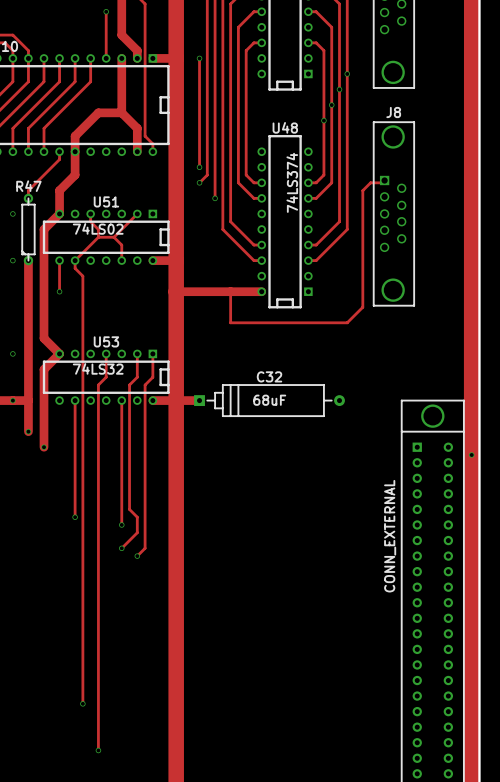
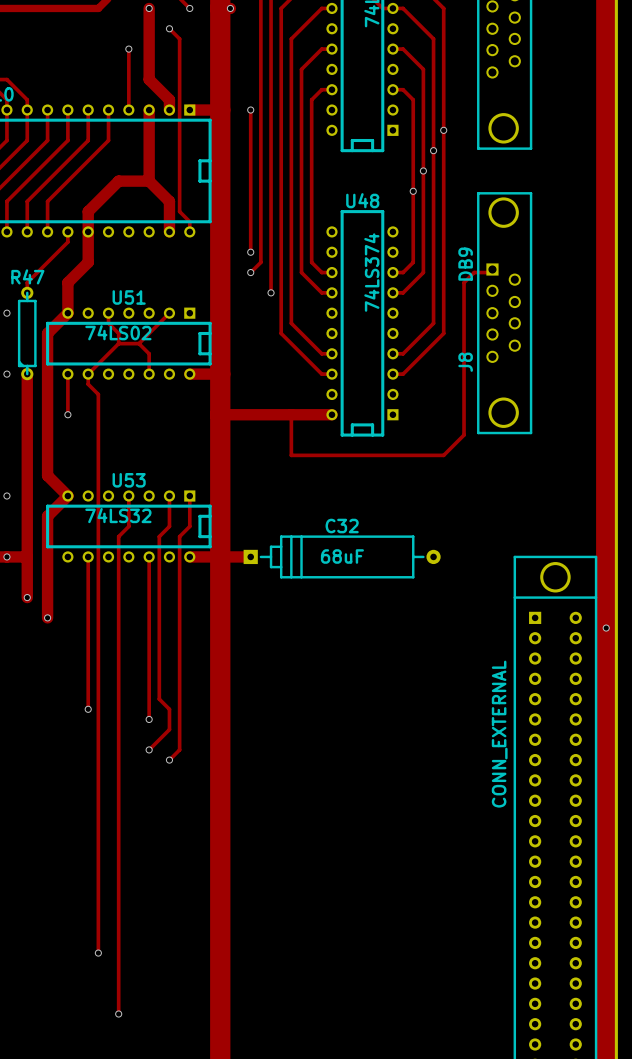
J8 name rotation: 0° (393, 112) -> 90° counterclockwise (465, 362)
J8 name position: J8 (393, 112) -> J8 (465, 362)
J8 value: none -> DB9 (465, 264)

